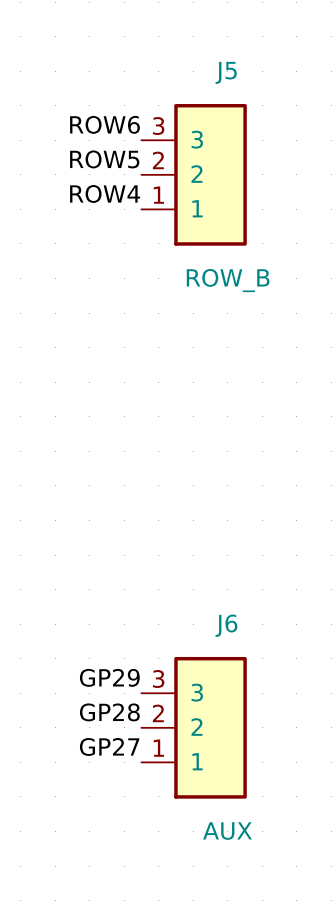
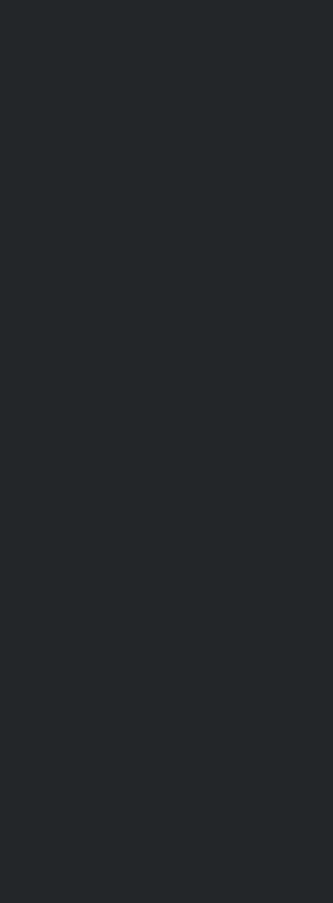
label: ROW6 (105, 124) -> none
label: ROW5 (104, 159) -> none
J5: ROW_B (194, 174) -> none
label: ROW4 (105, 193) -> none
label: GP29 (109, 677) -> none
label: GP28 (109, 712) -> none
J6: AUX (194, 727) -> none
label: GP27 (109, 746) -> none

